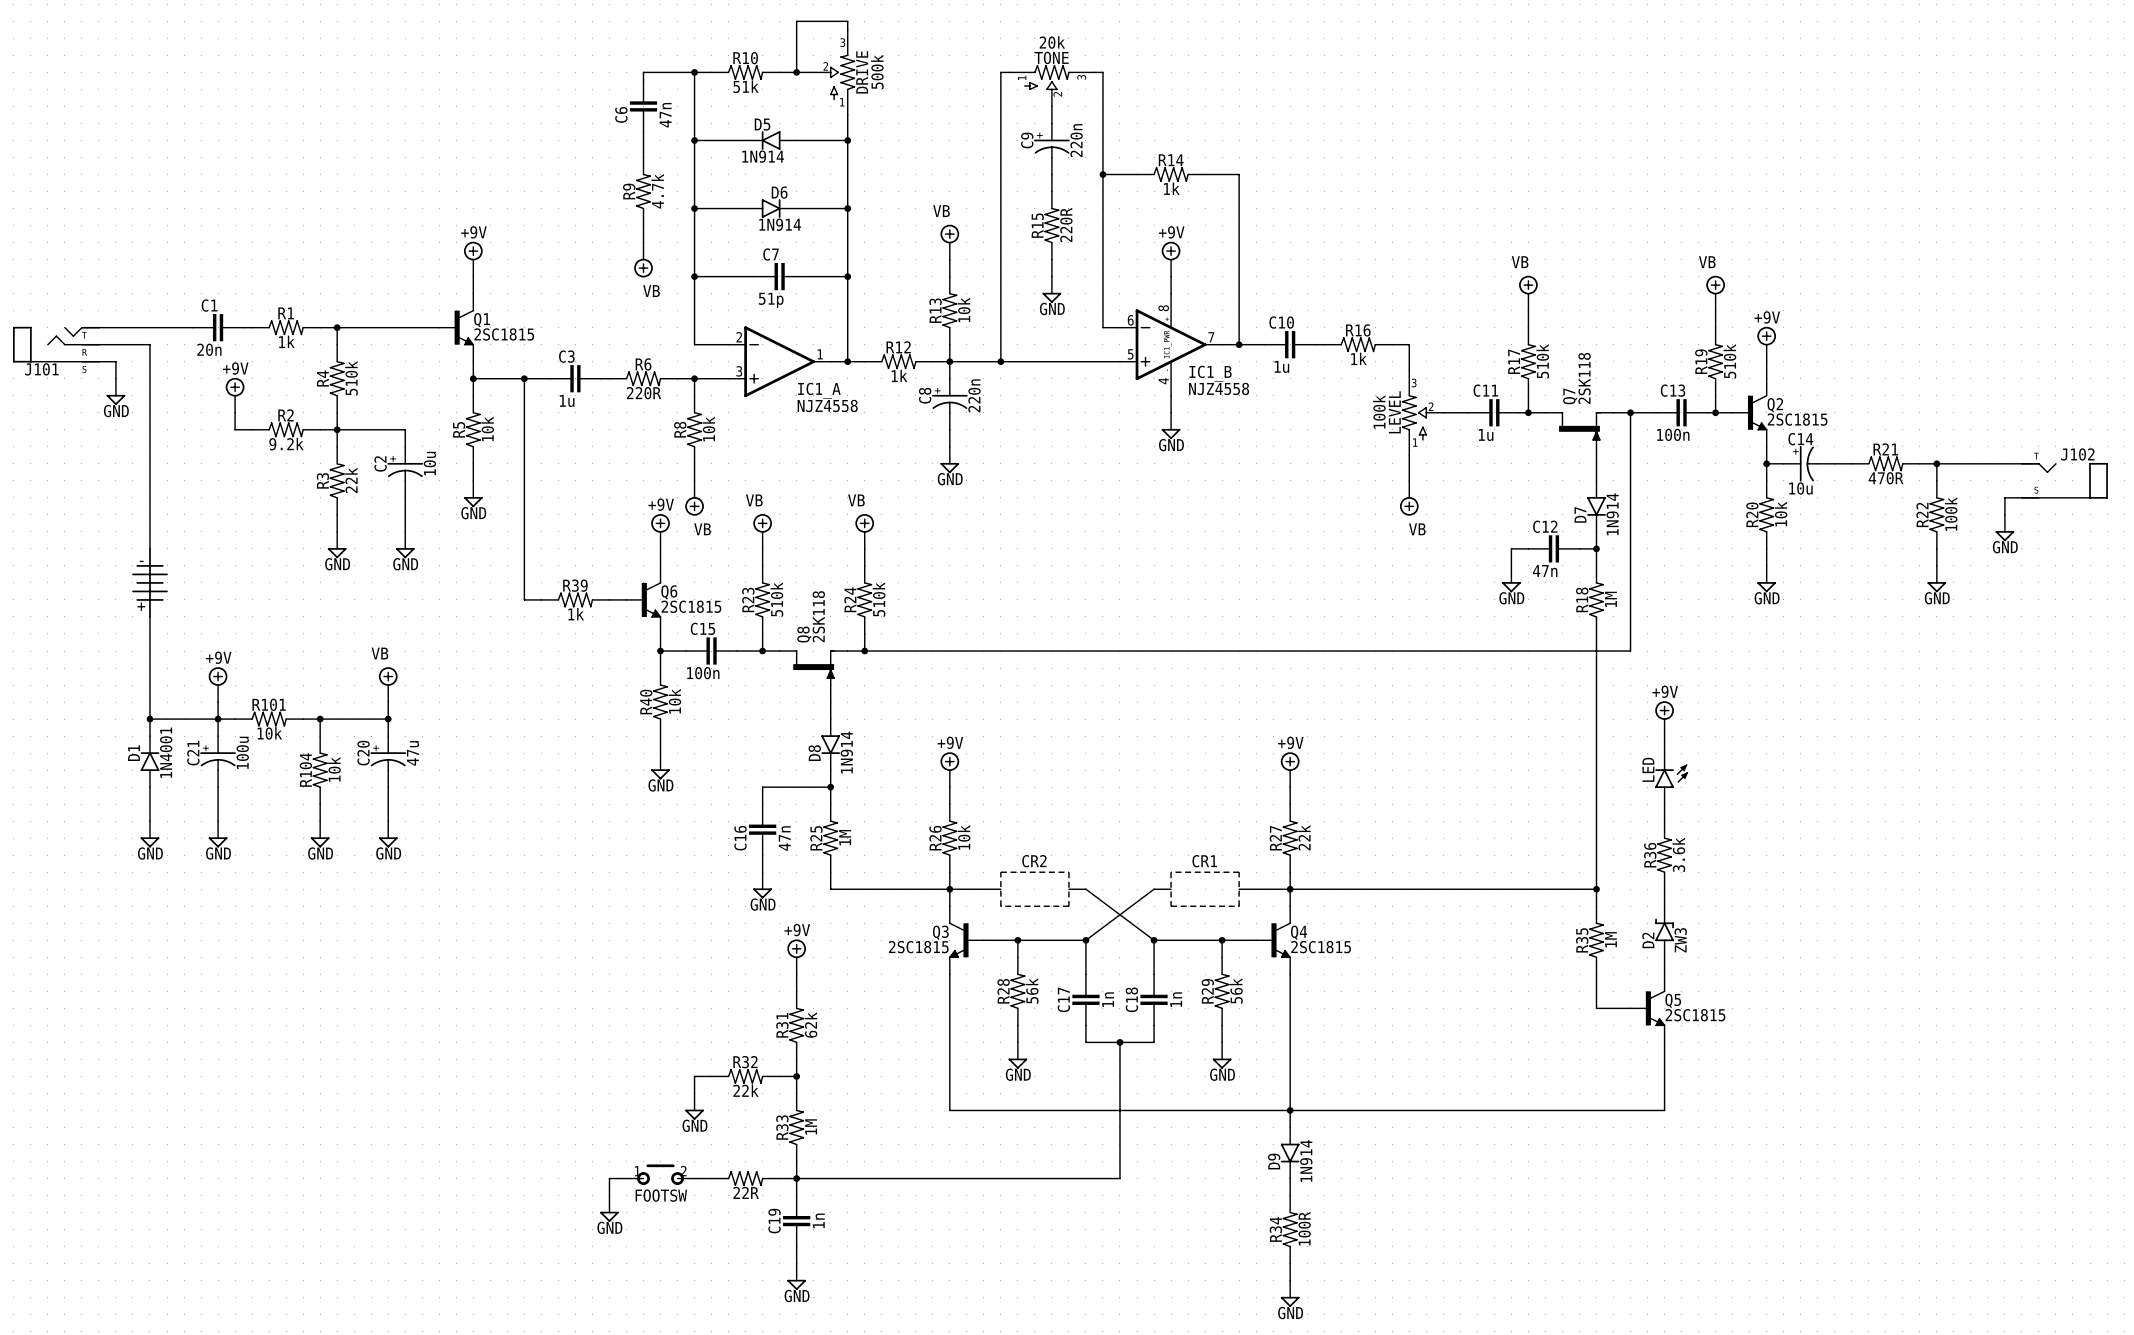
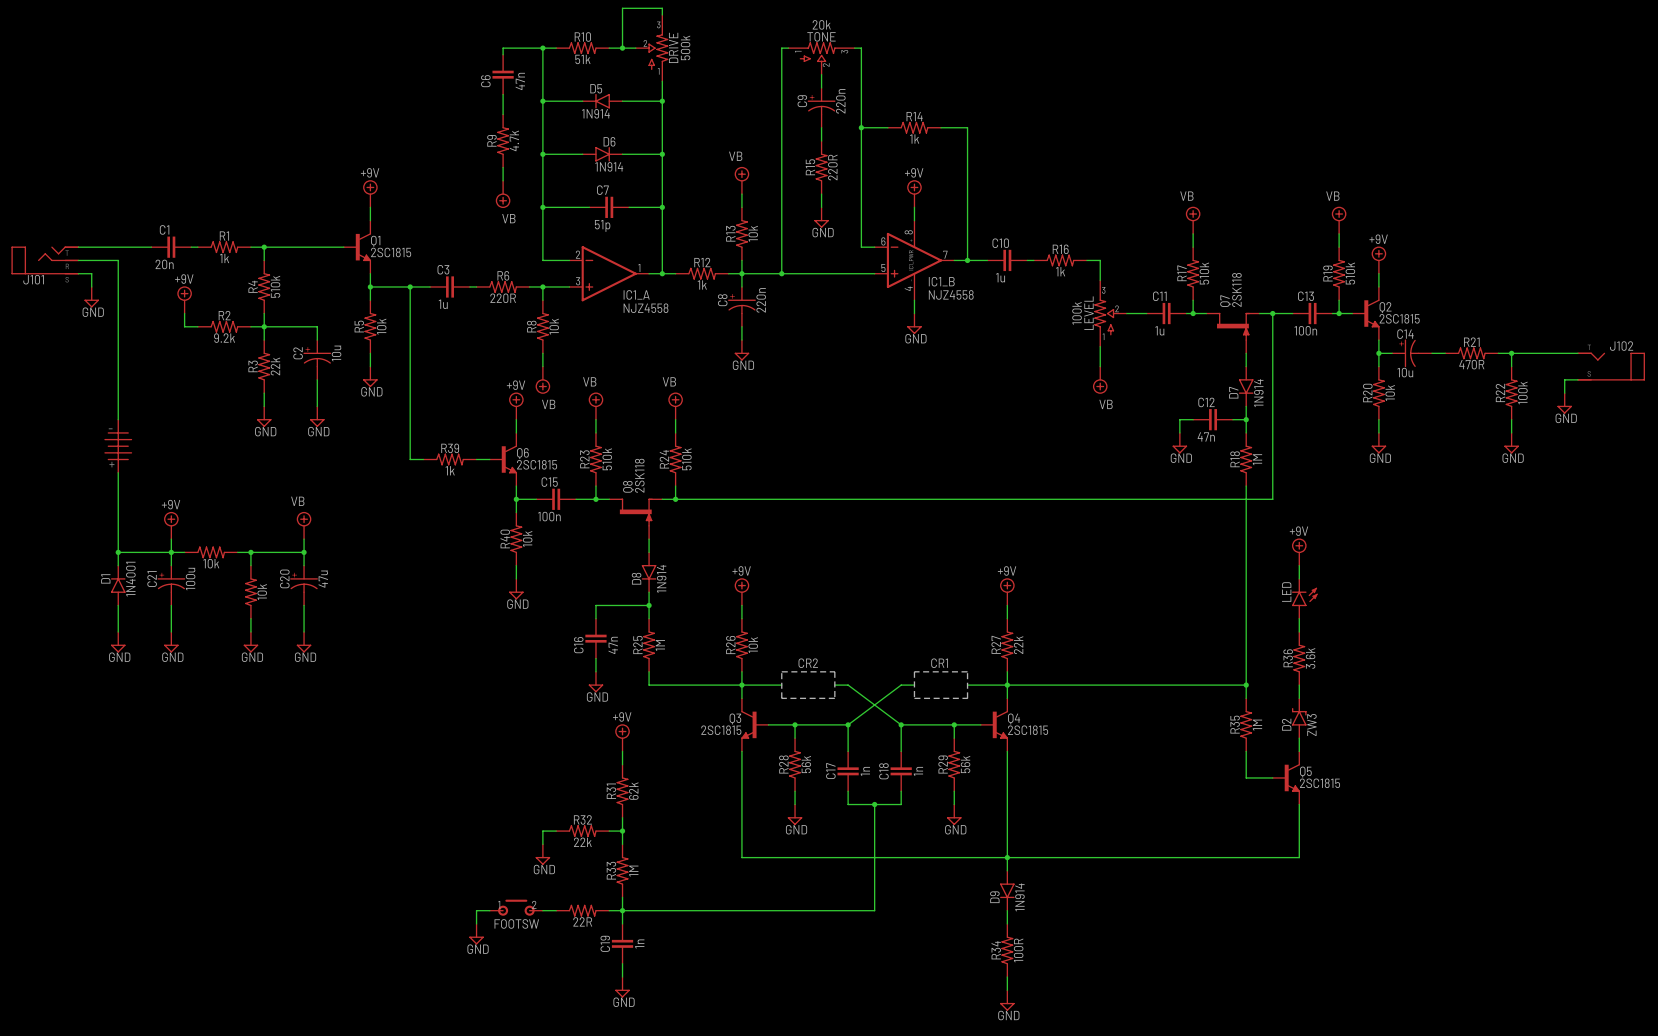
R101 name: R101 (269, 704) -> none
R104 name: R104 (305, 769) -> none

